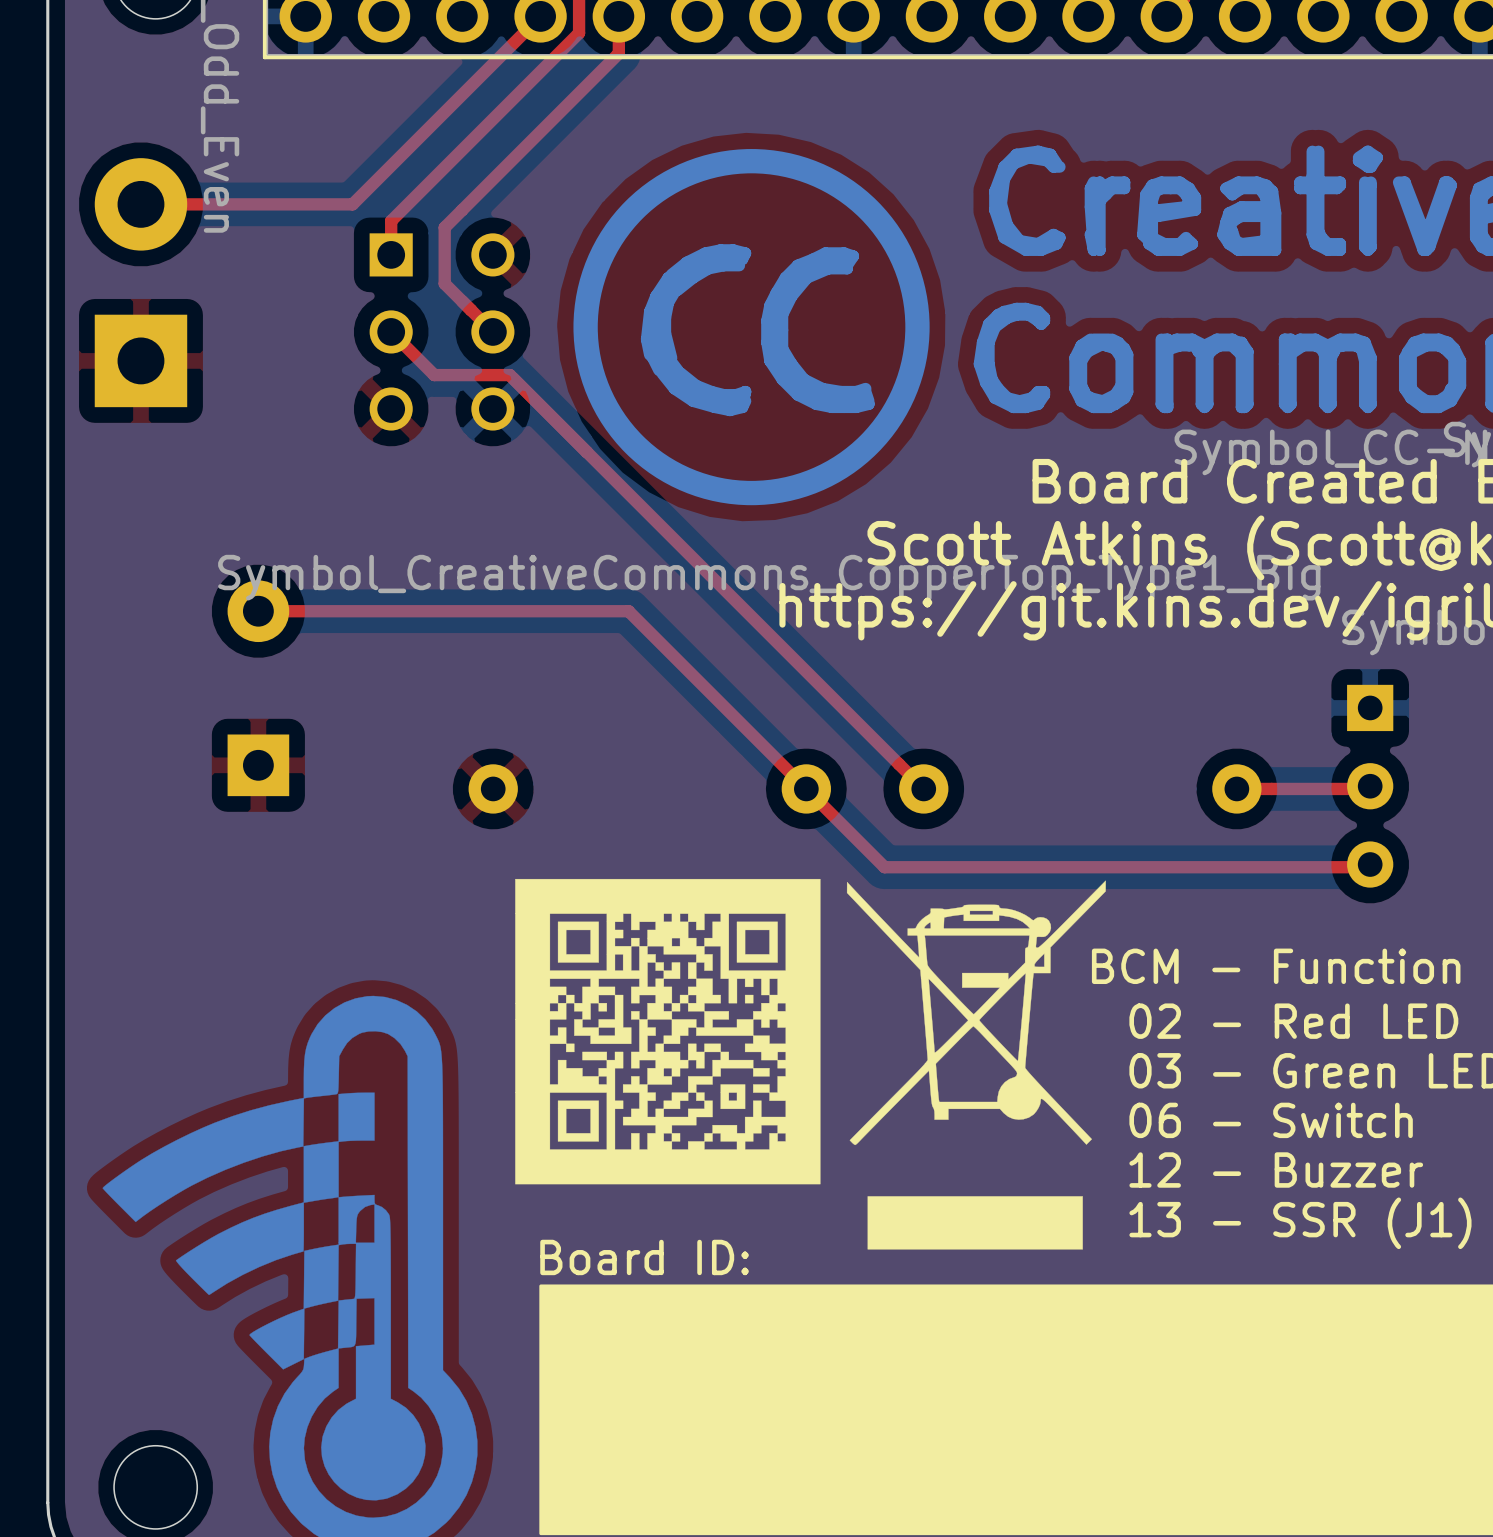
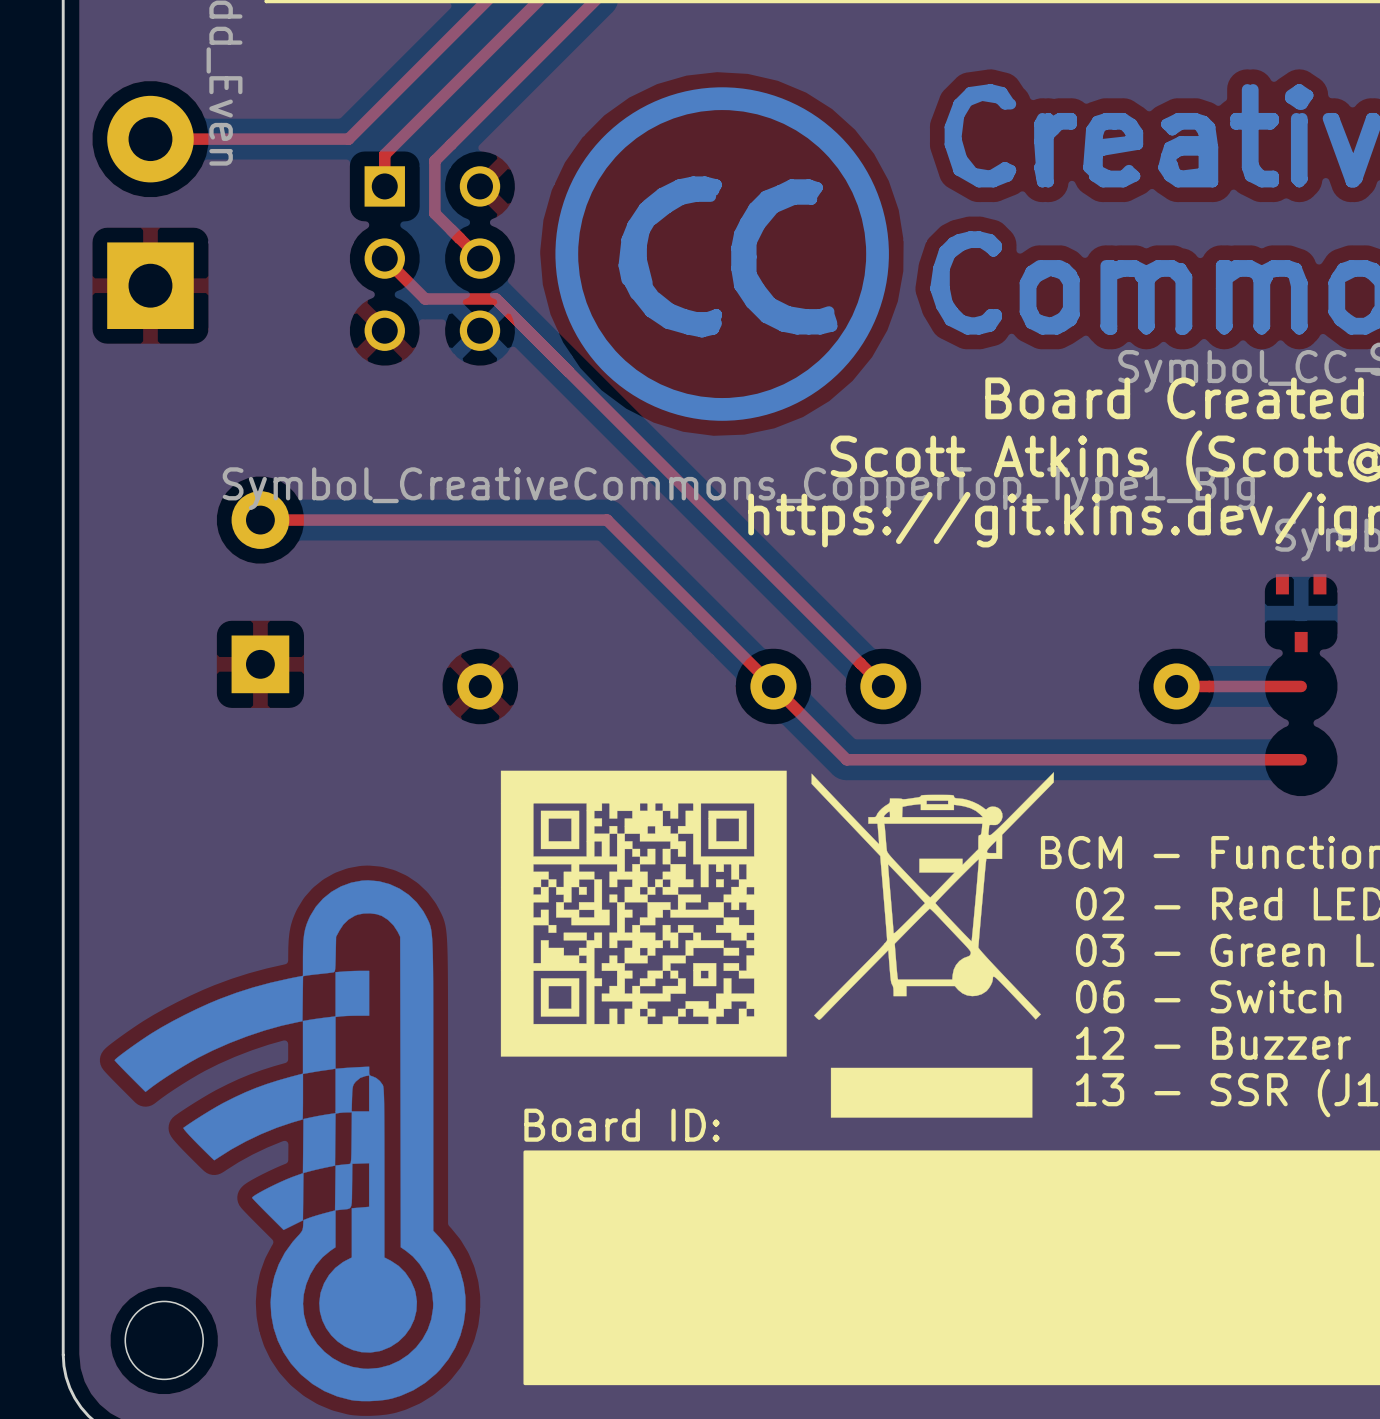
part: none -> (1301, 613)
part: (1370, 786) -> none

